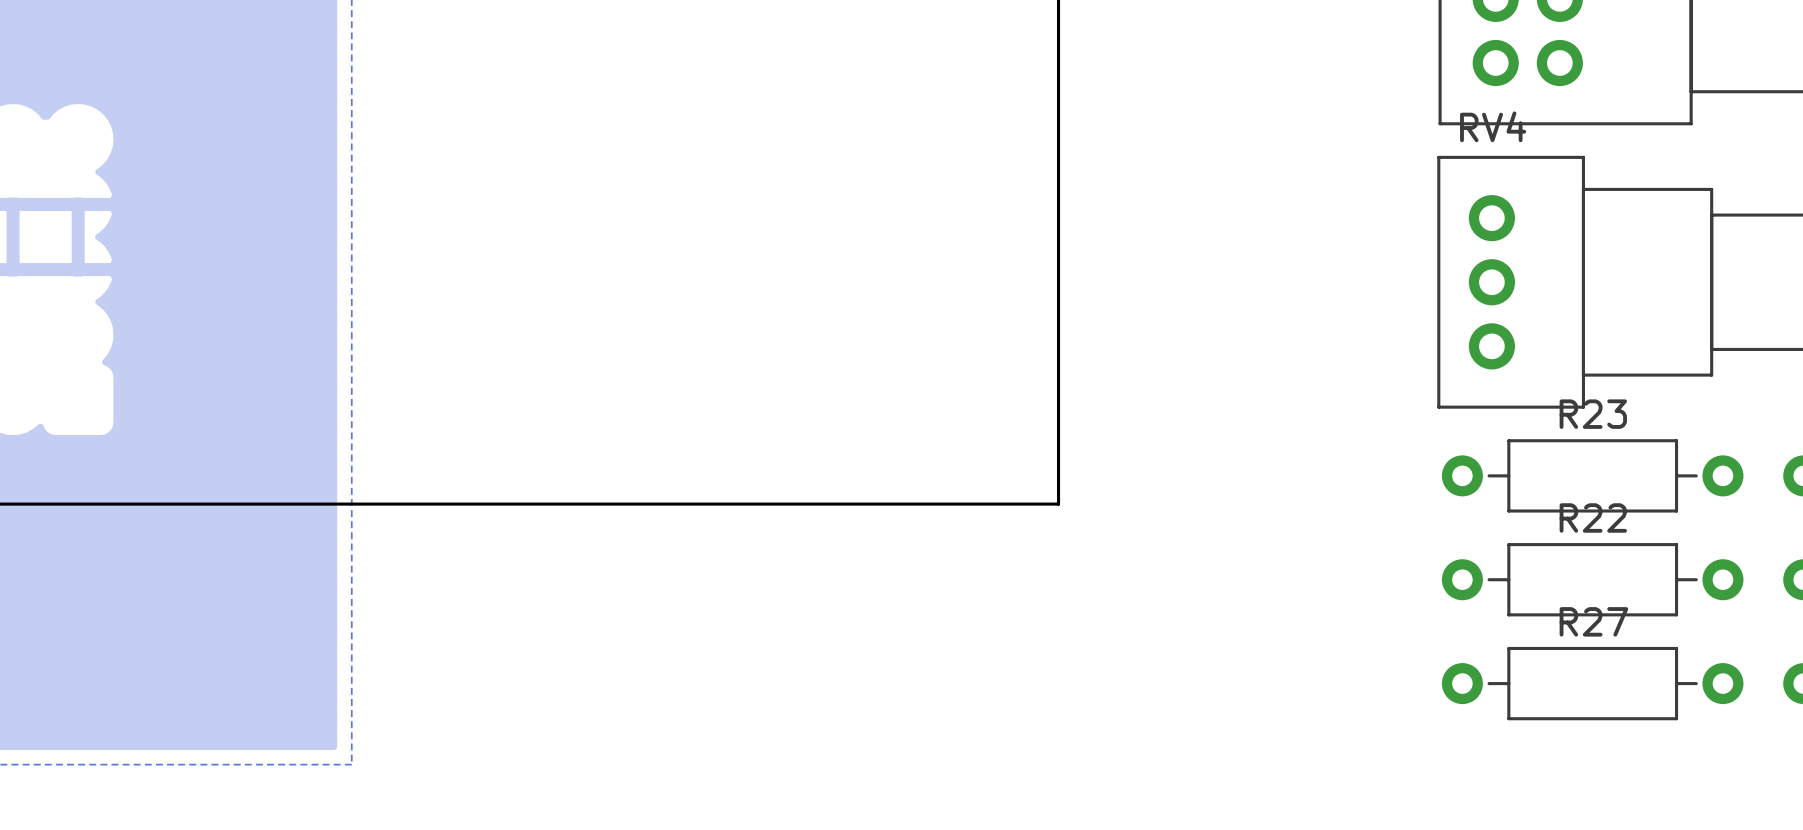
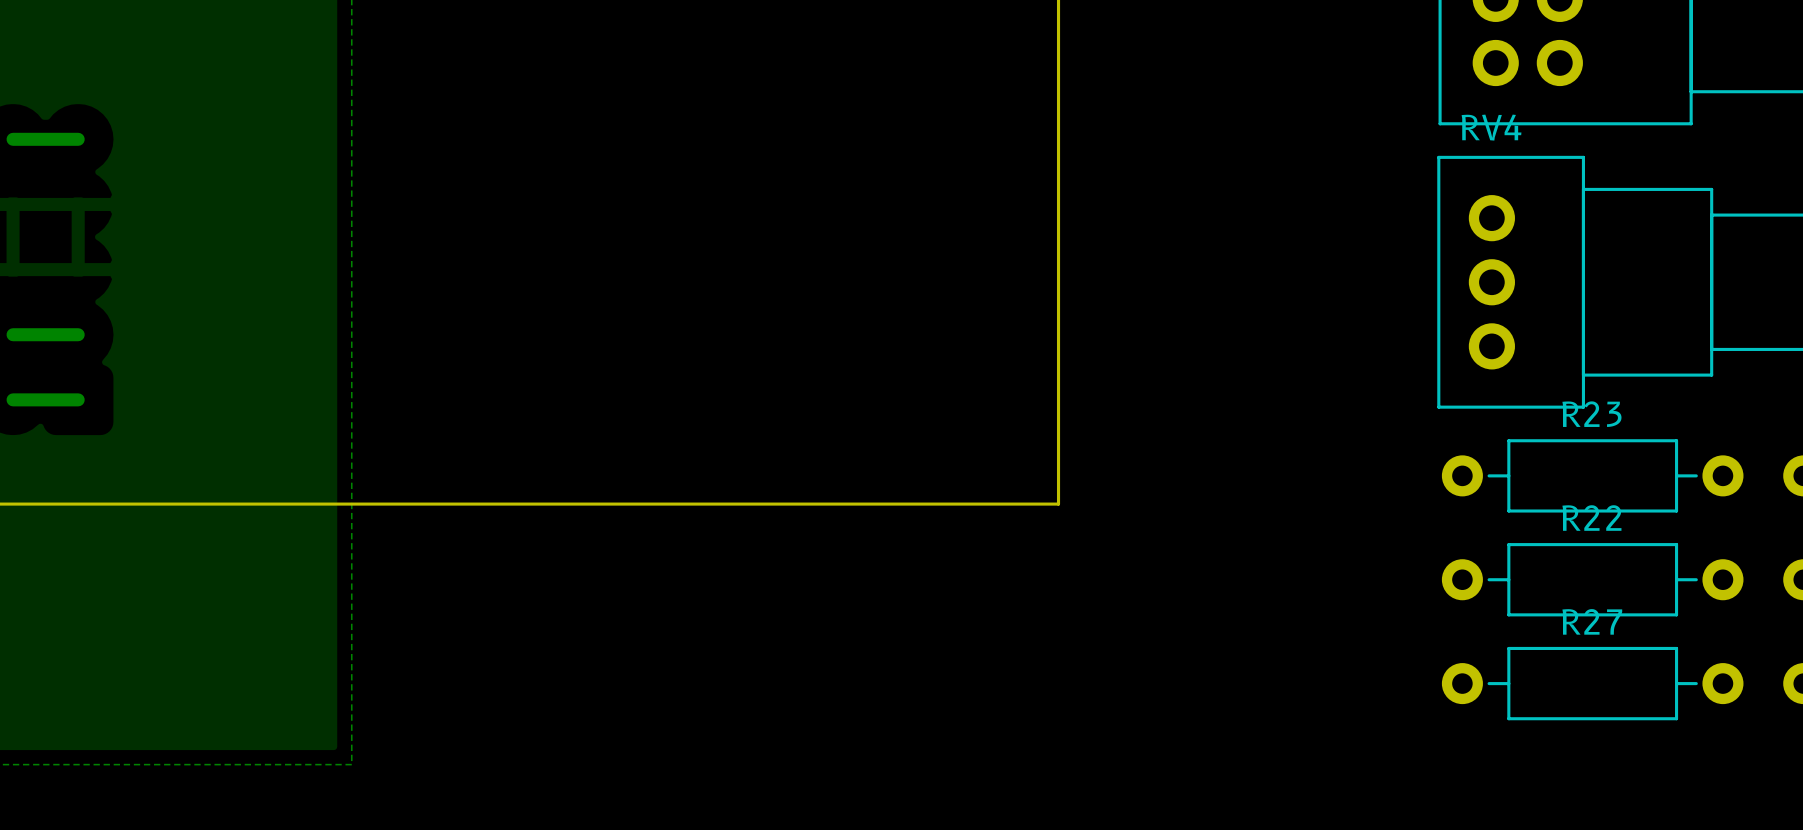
bottom track: none -> (13, 139) (78, 139)
bottom track: none -> (13, 334) (78, 334)
bottom track: none -> (13, 399) (78, 399)

